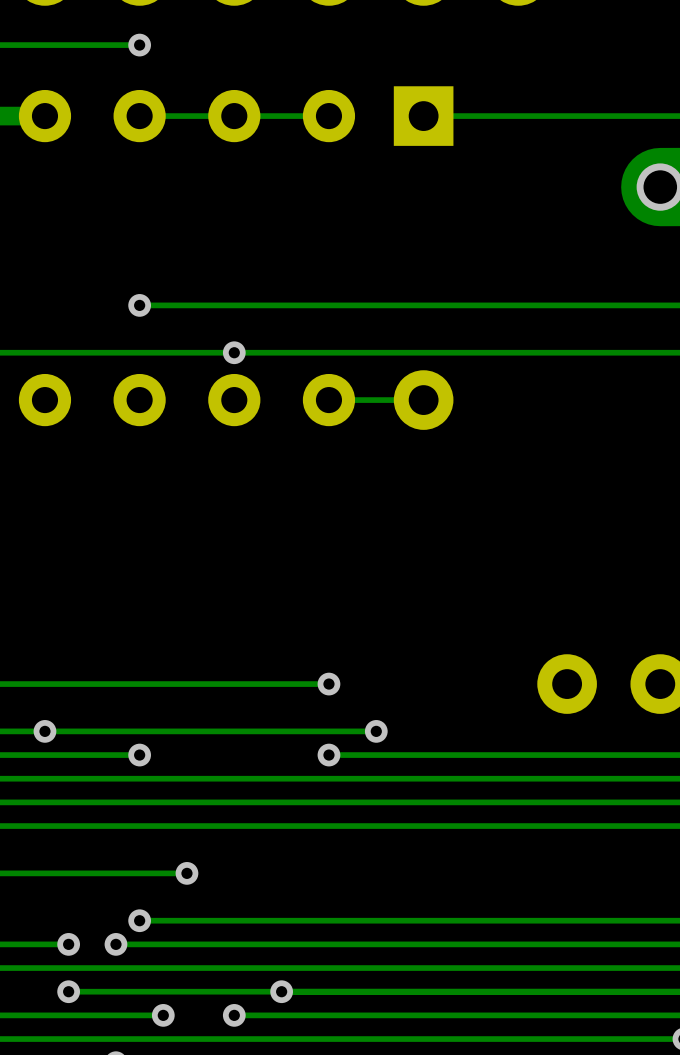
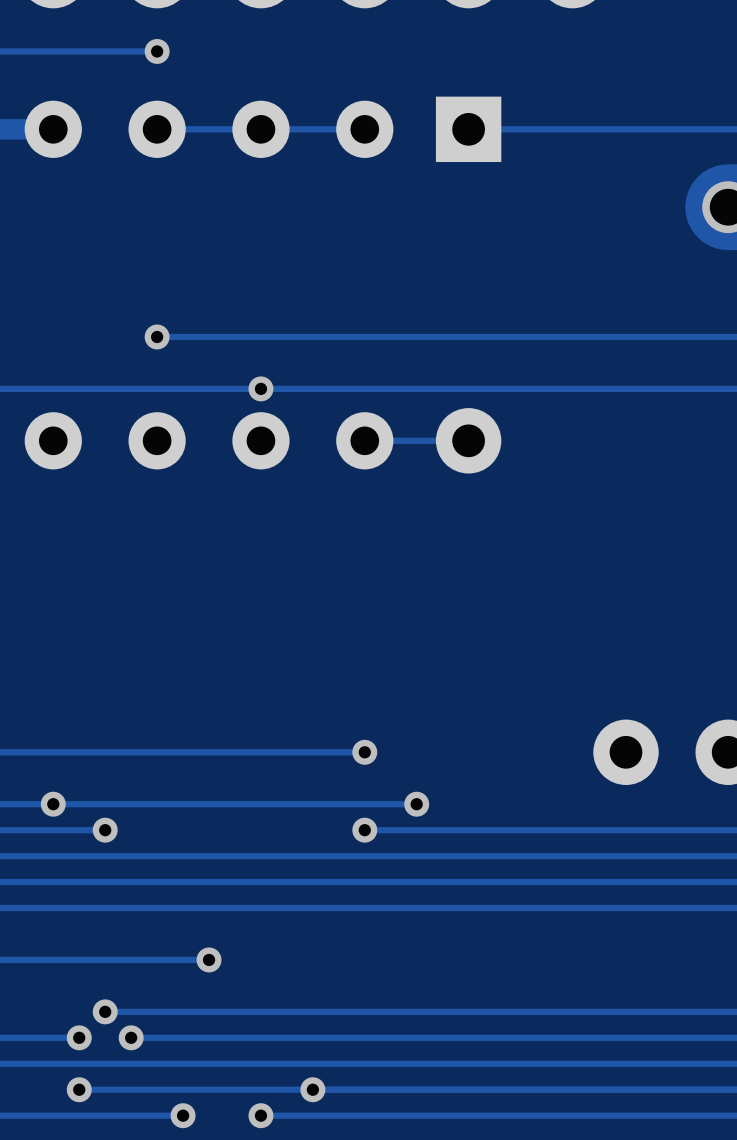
track: (139, 755) (92, 755) -> (157, 1011) (105, 1011)
via position: (139, 755) -> (105, 830)
via position: (139, 920) -> (105, 1011)

